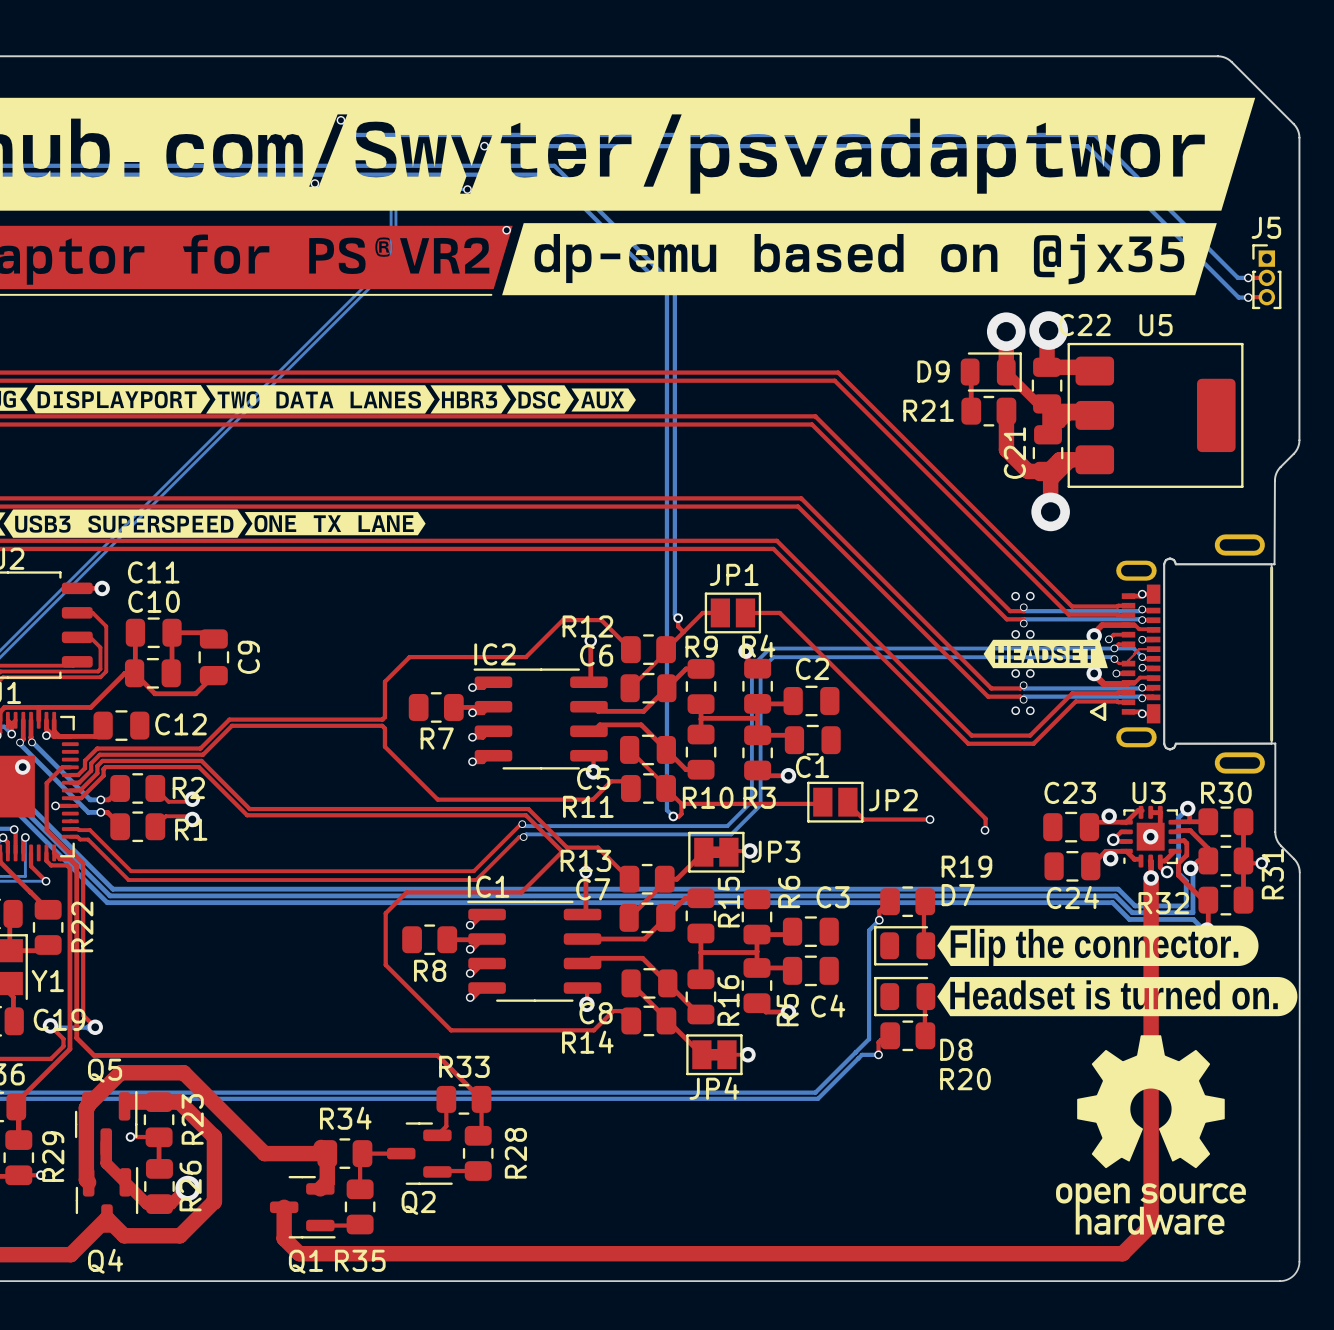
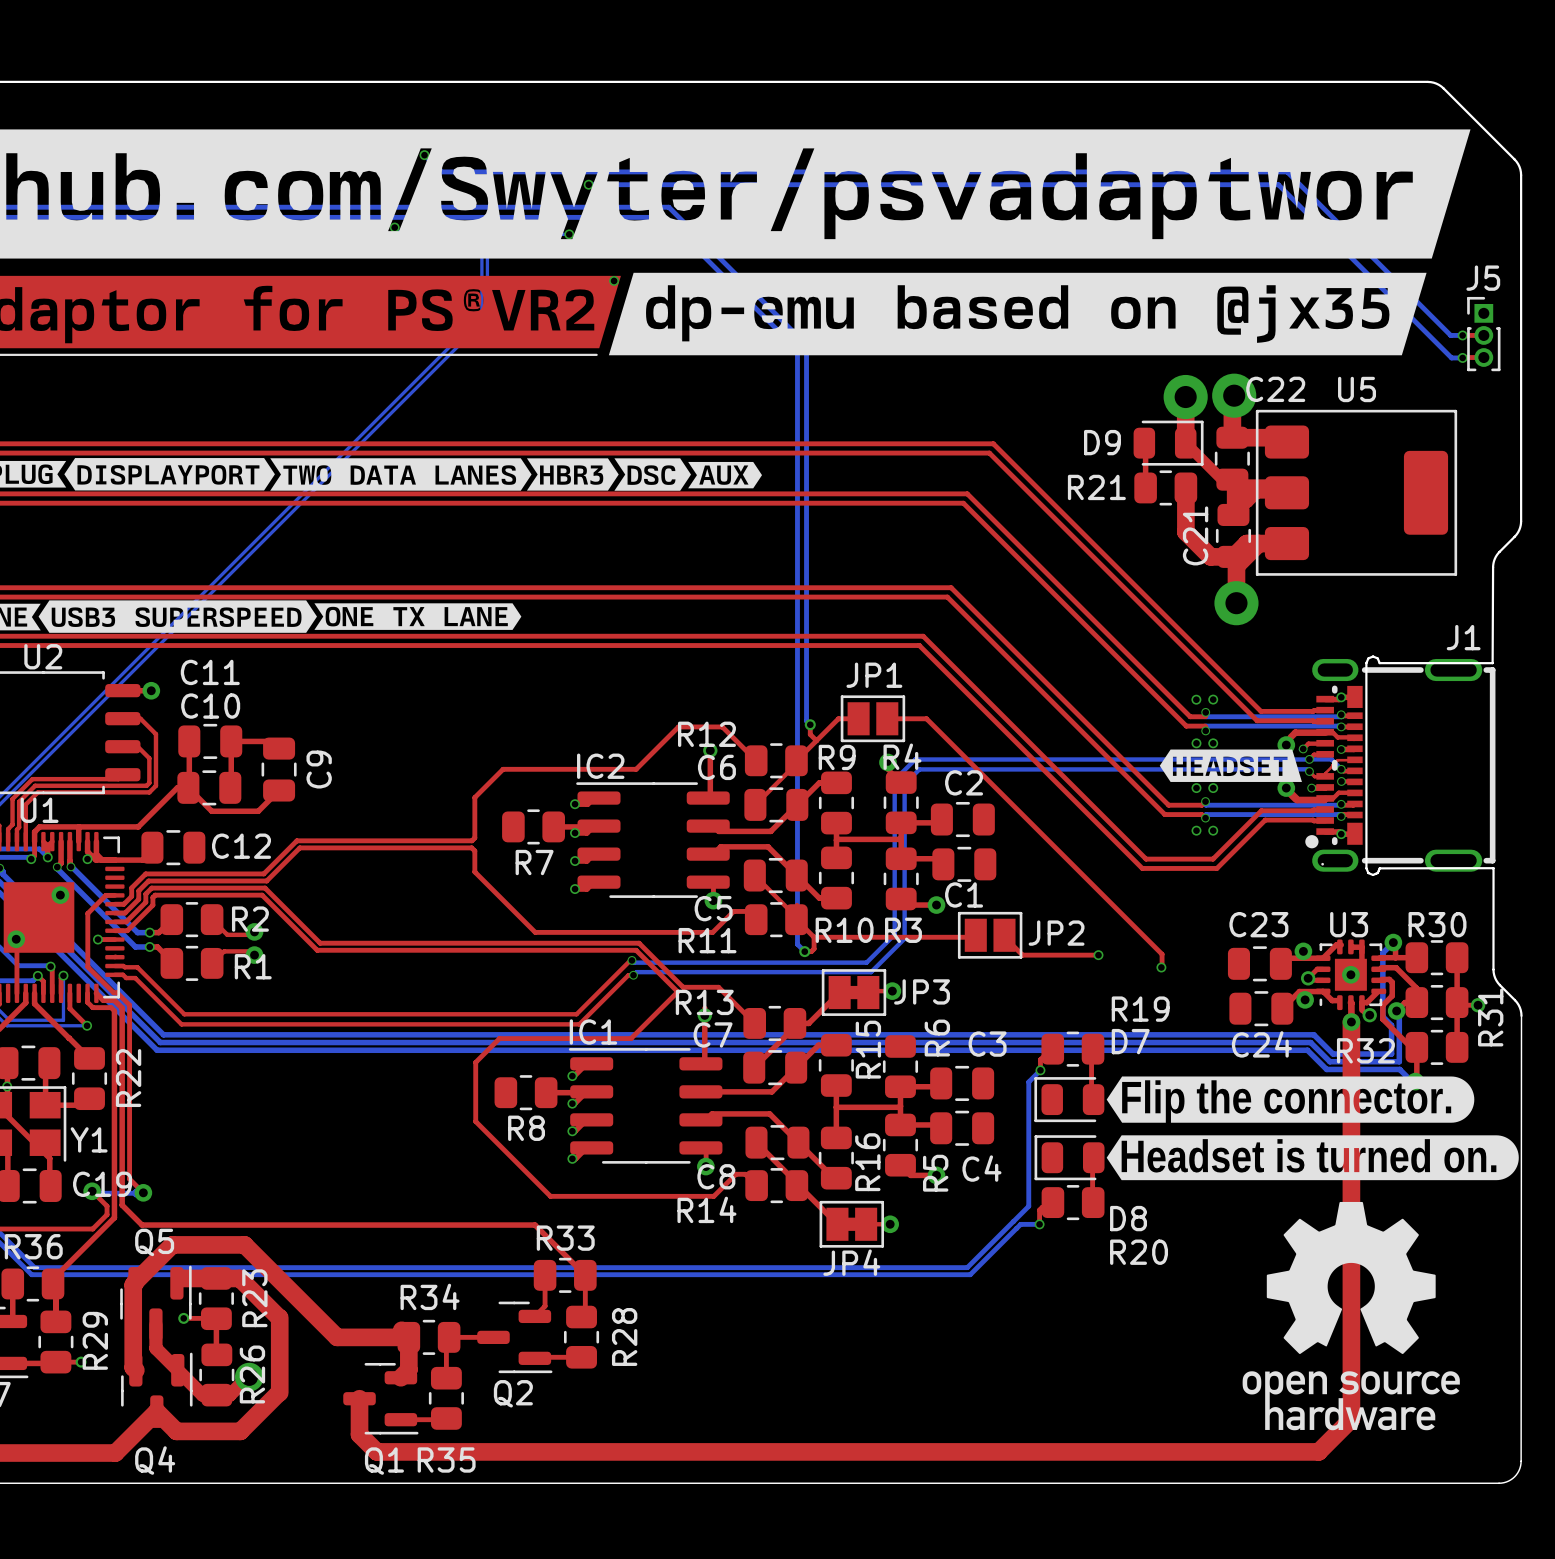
part: (1181, 653) -> none
J1: none -> (1400, 765)

